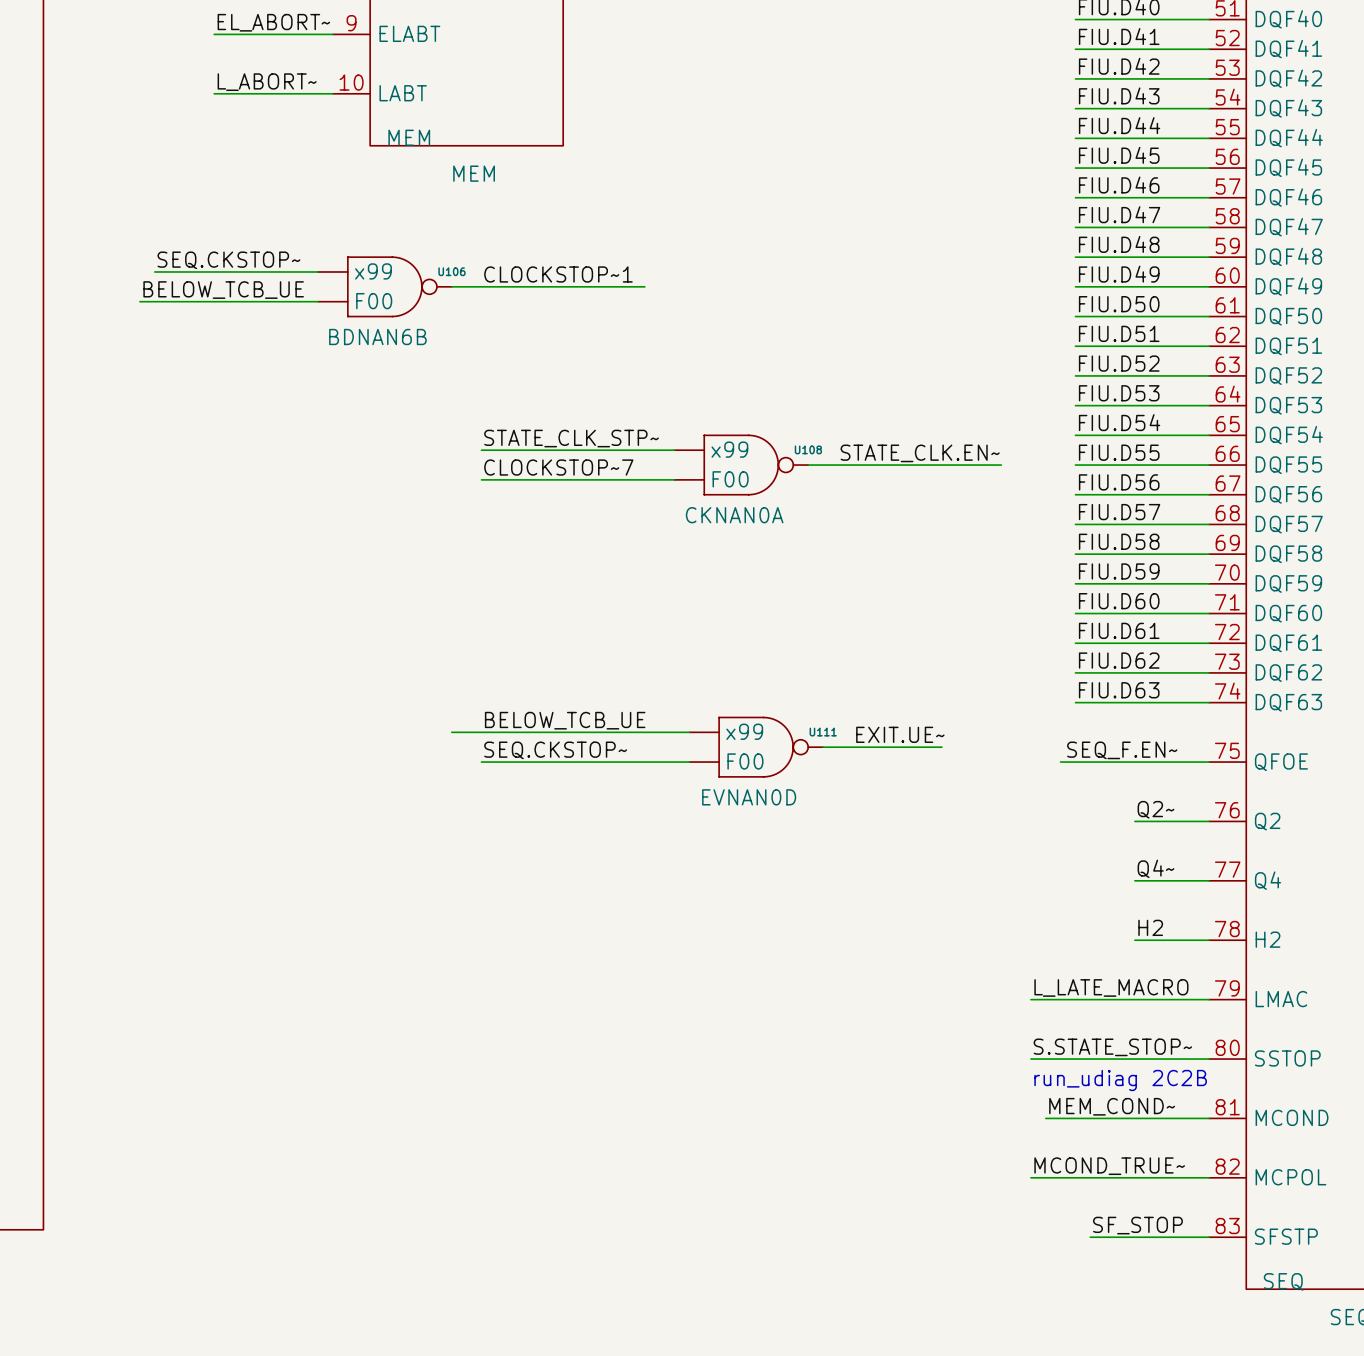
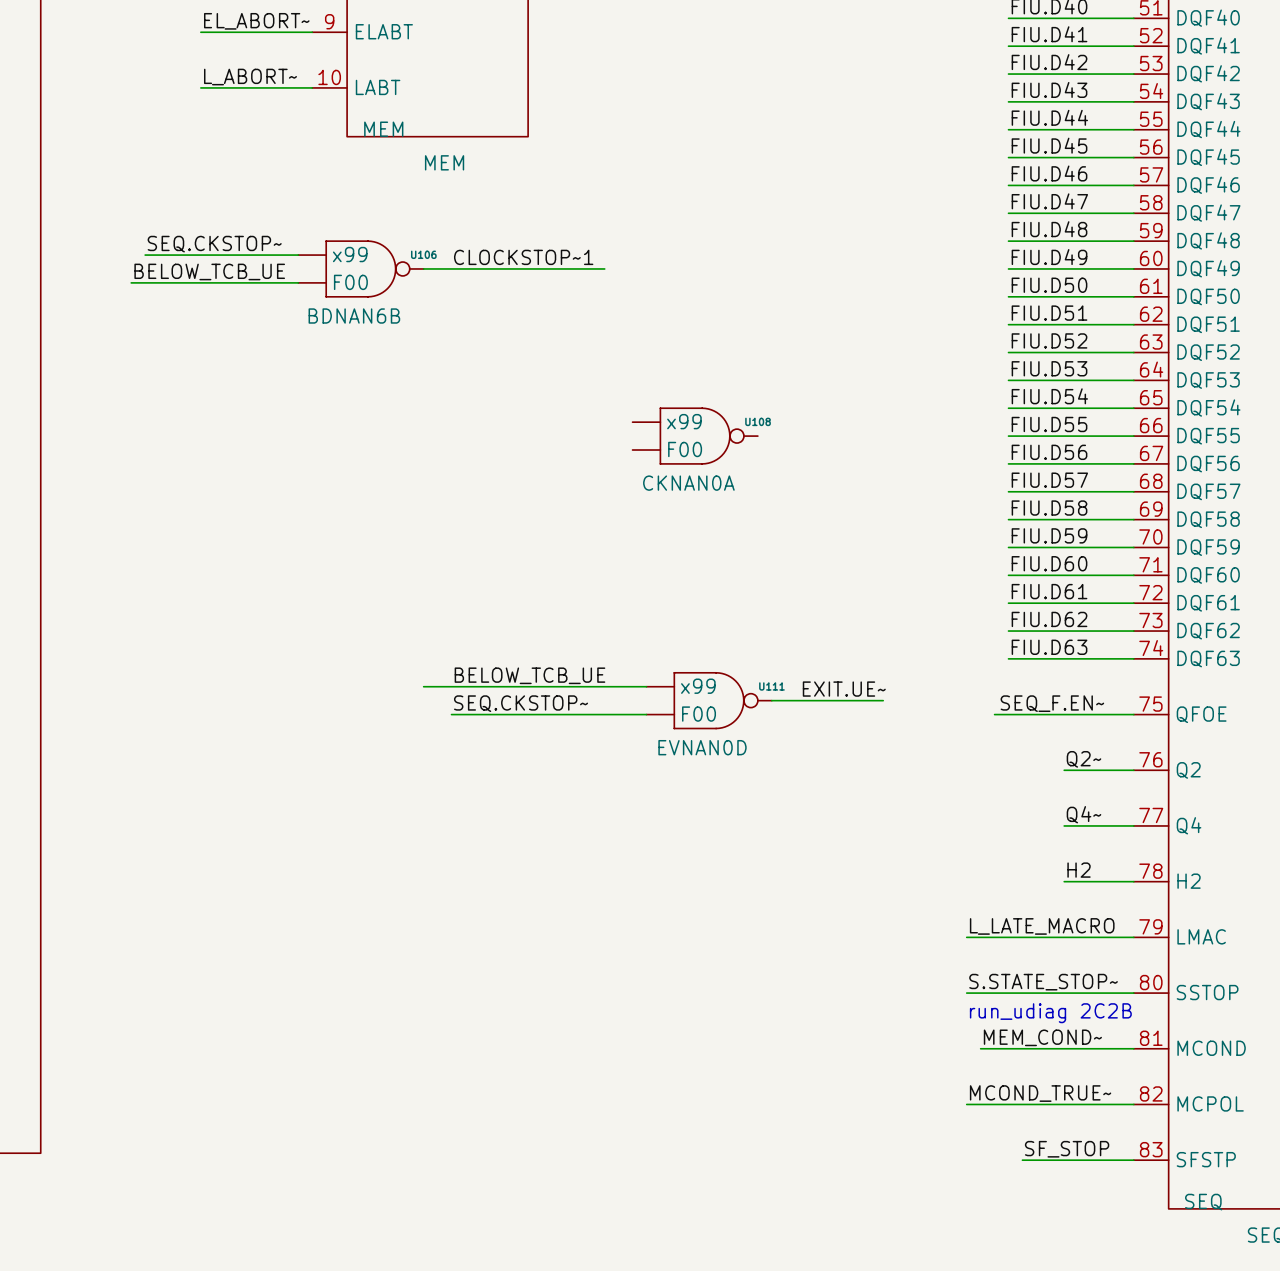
label: STATE_CLK_STP~ (571, 438) -> none
wire: (481, 450) (674, 450) -> none
label: STATE_CLK.EN~ (920, 453) -> none
wire: (808, 465) (1001, 465) -> none
label: CLOCKSTOP~7 (558, 467) -> none
wire: (481, 479) (674, 479) -> none

